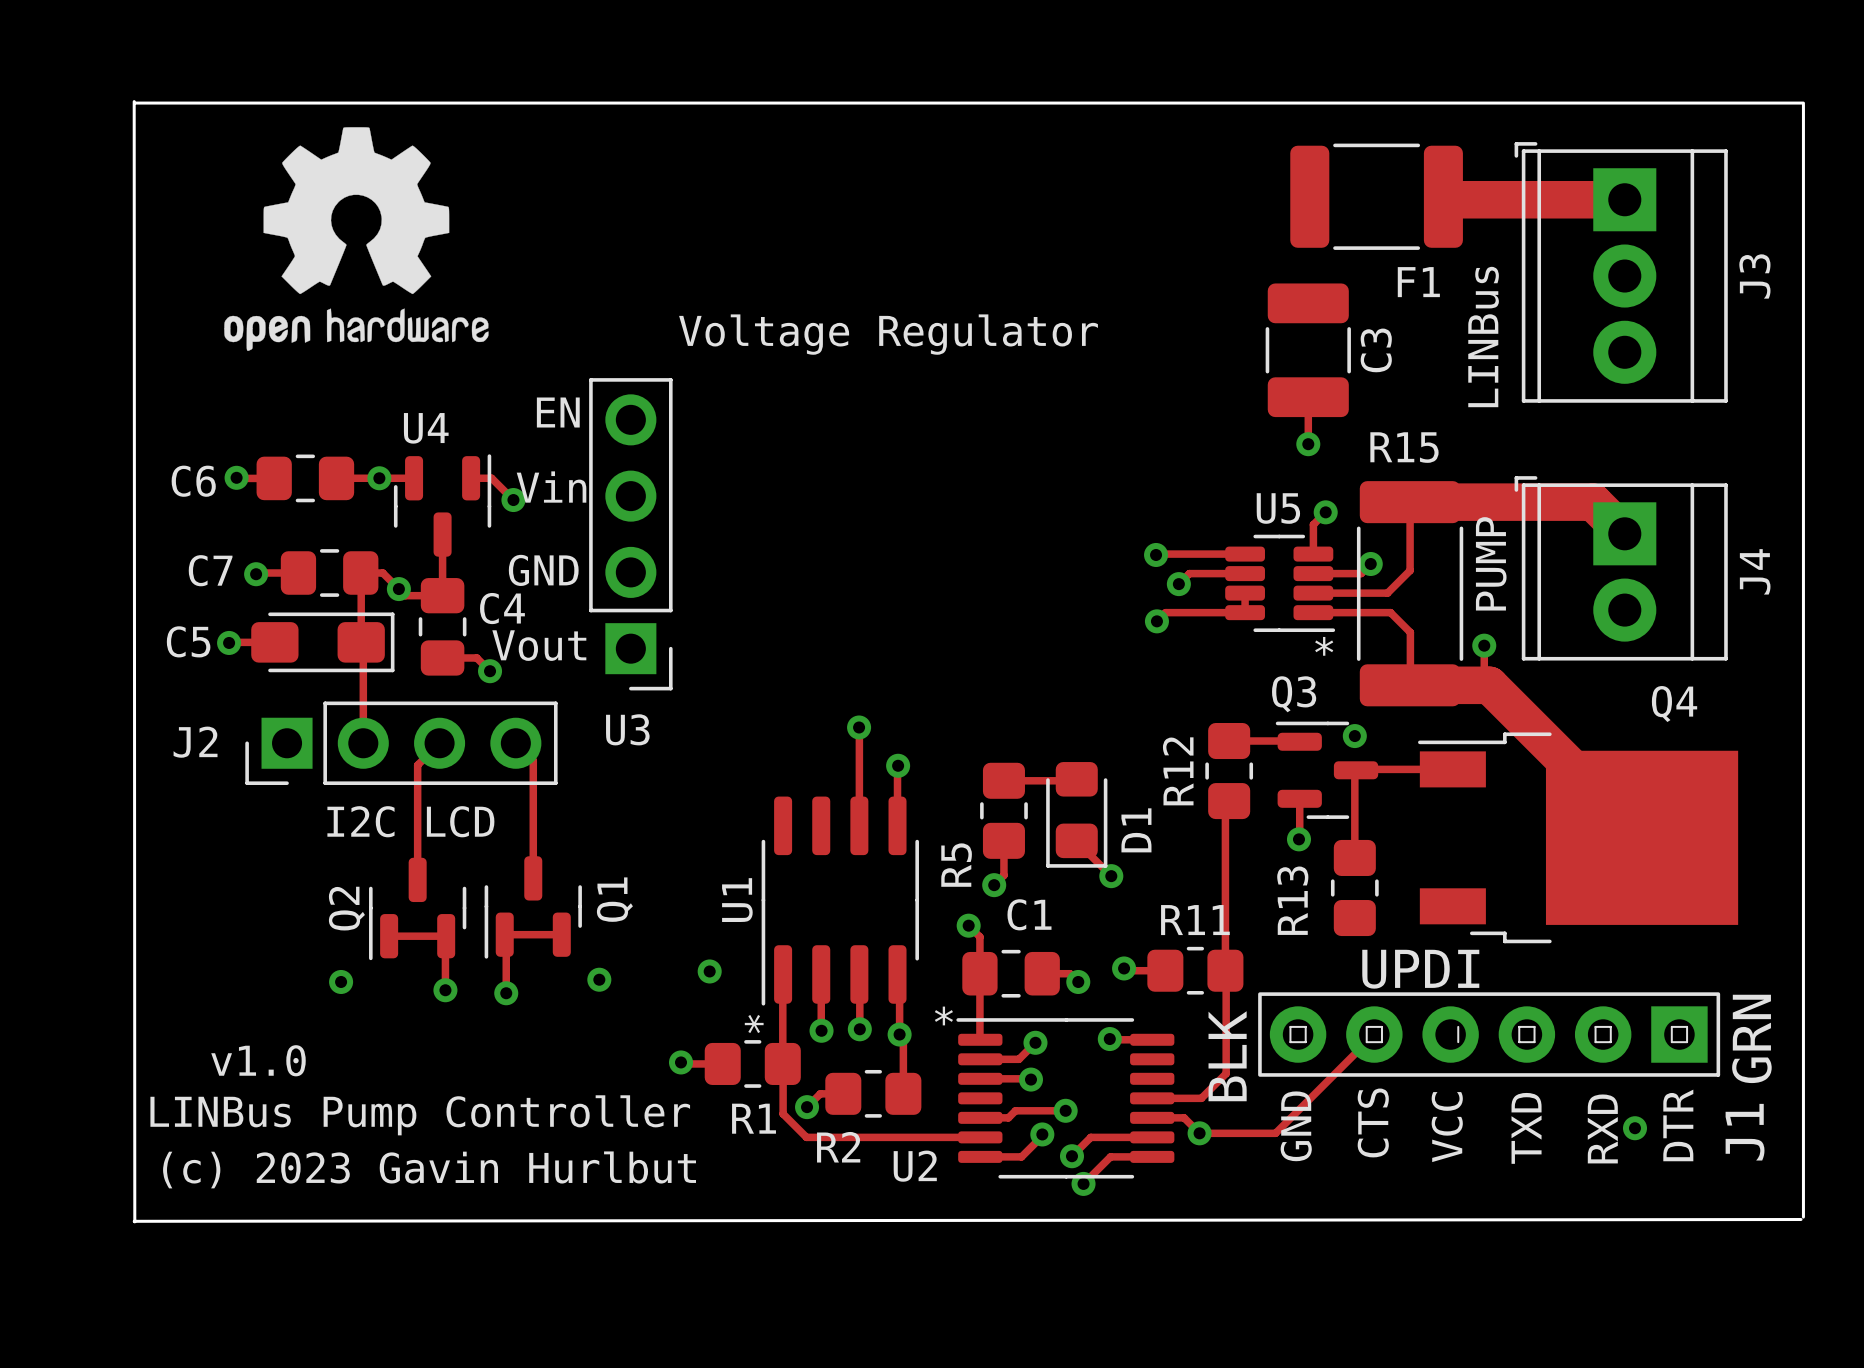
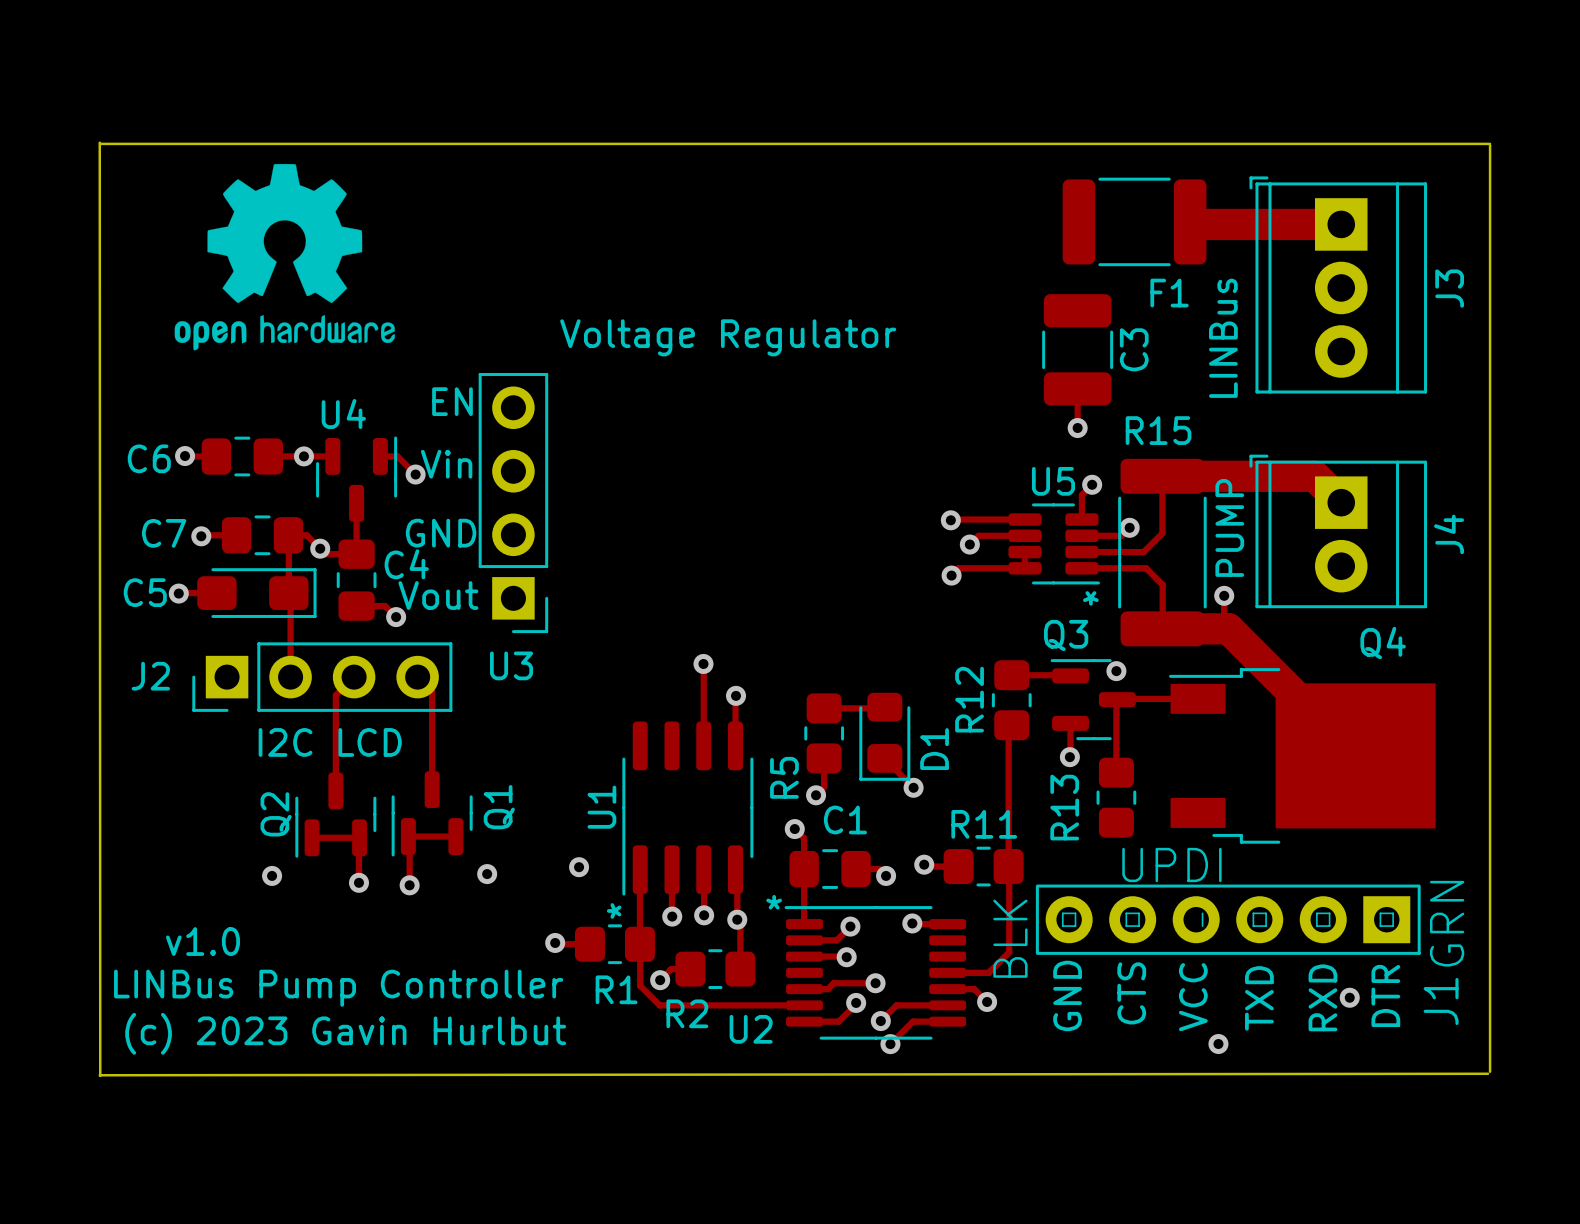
track: (1374, 1034) (1275, 1133) (1199, 1133) -> none
via: none -> (1218, 1044)

